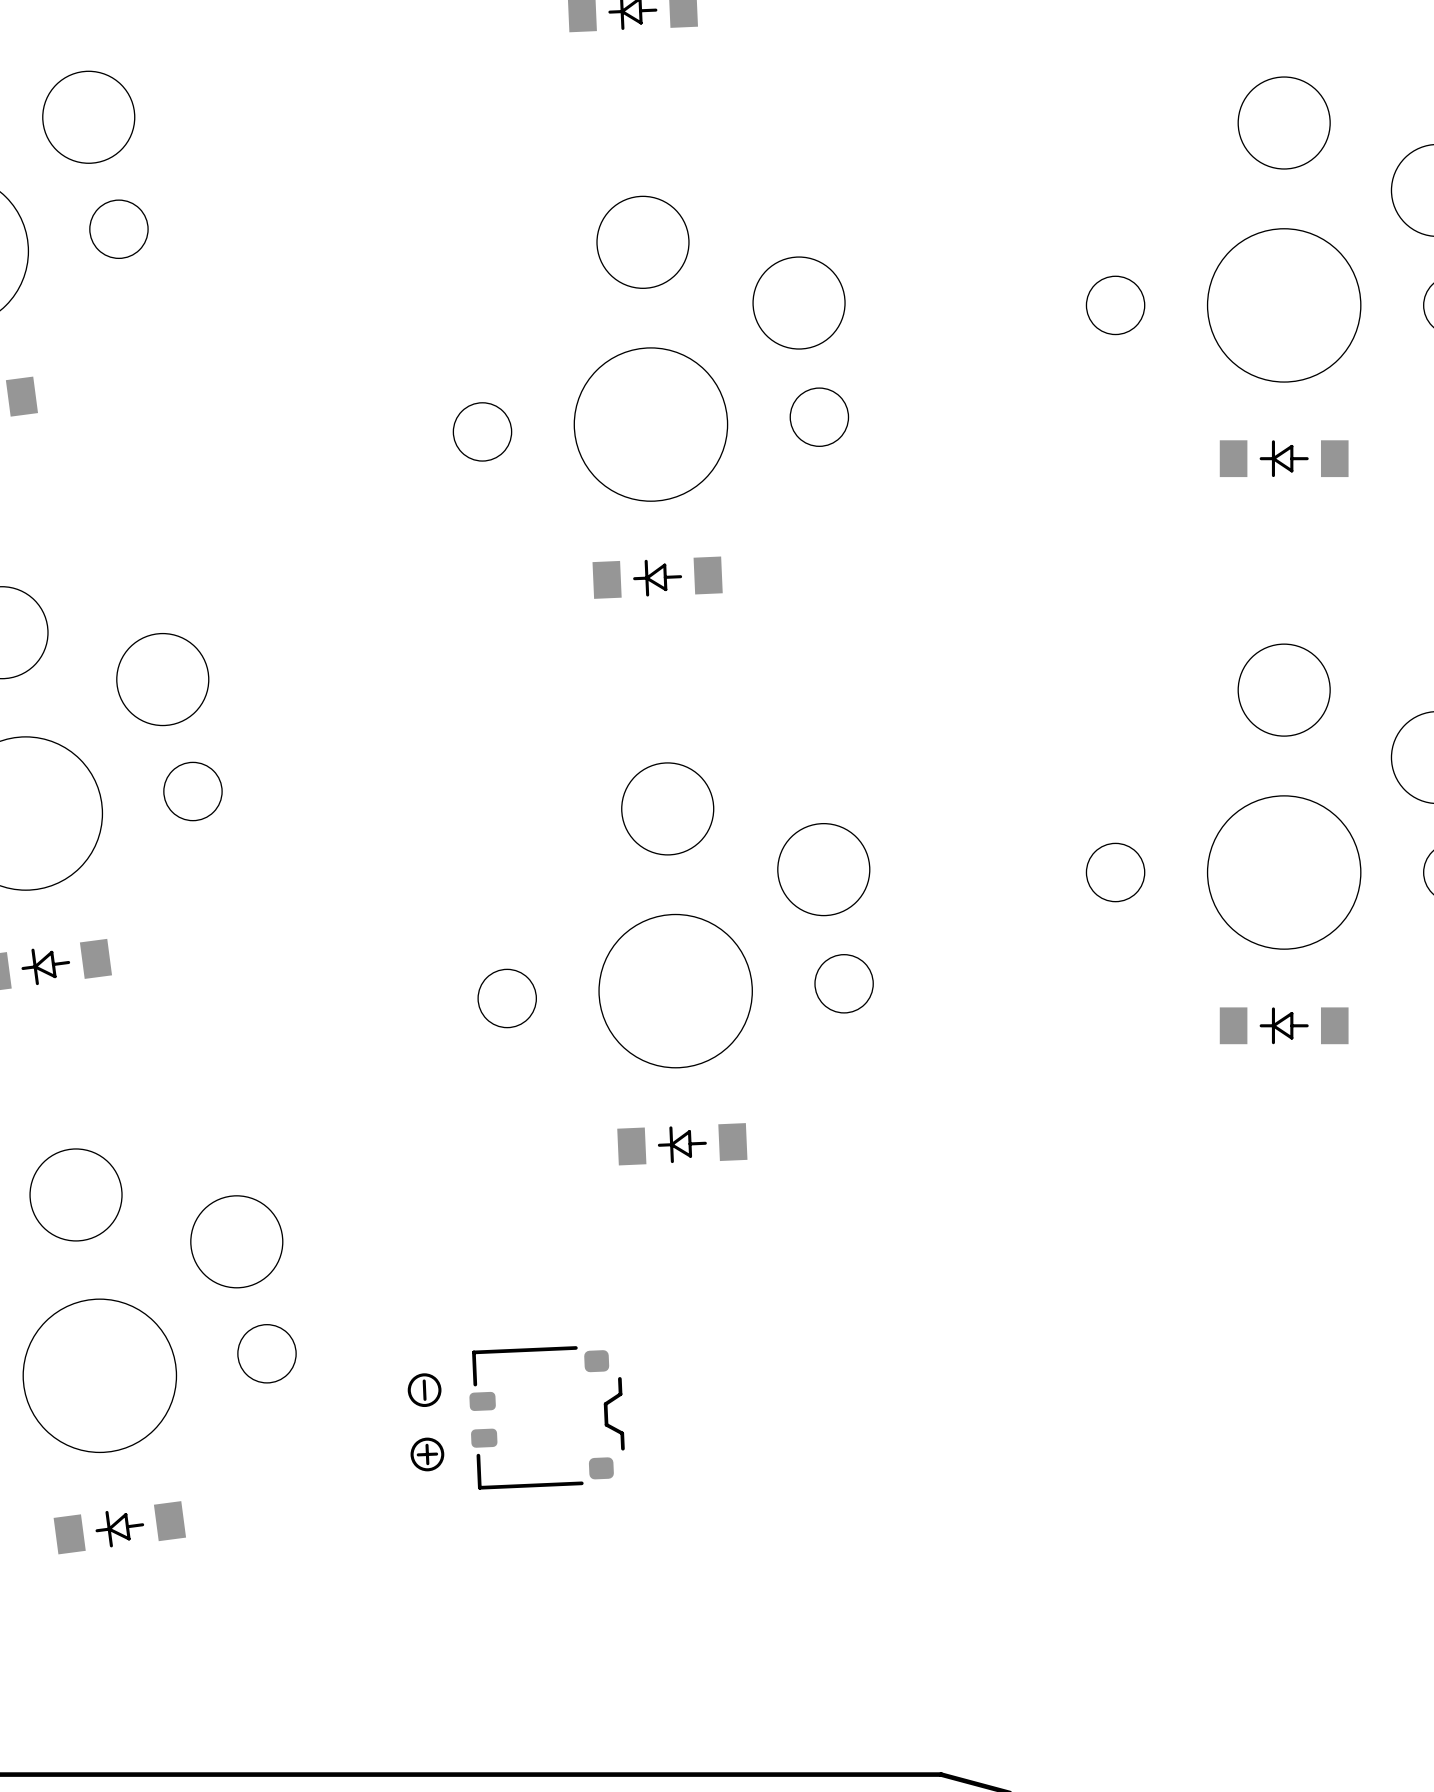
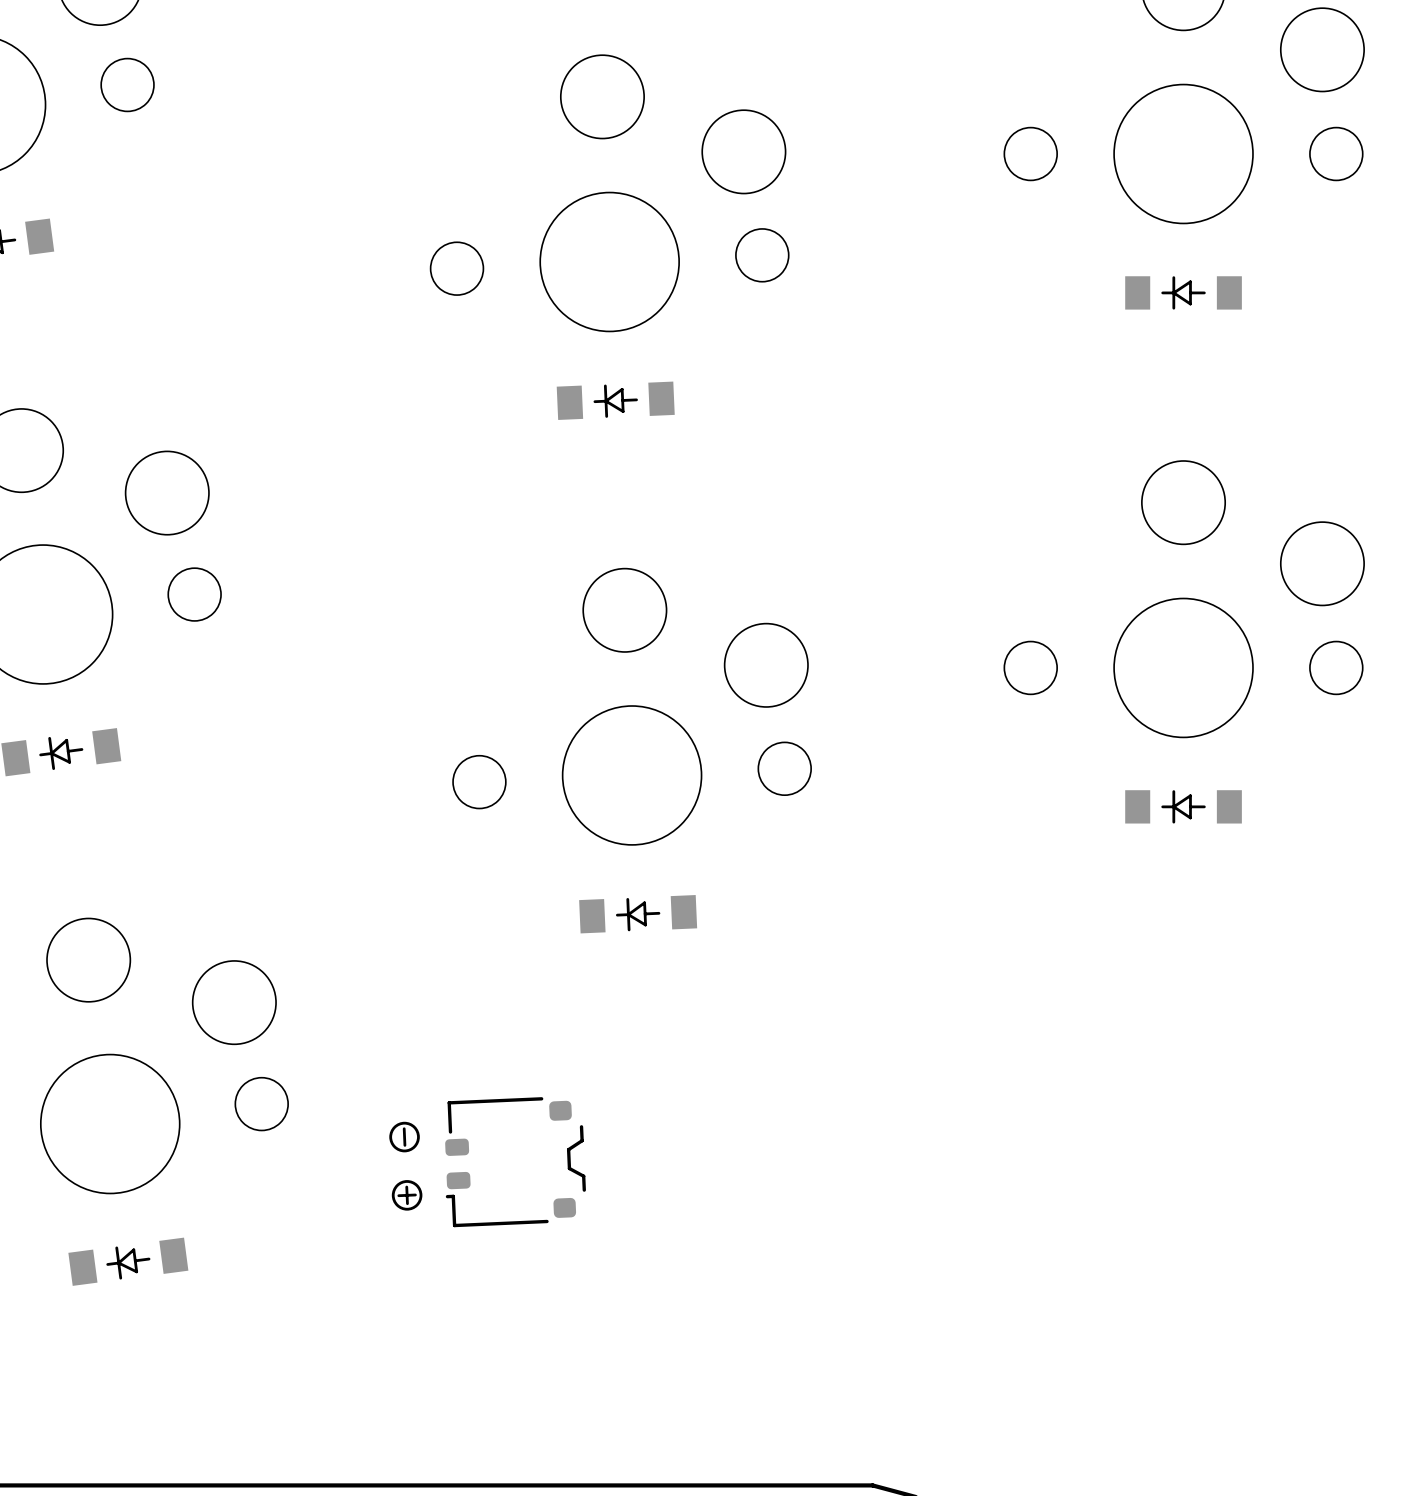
part footprint: [469, 1346, 625, 1490] -> [445, 1097, 586, 1228]

